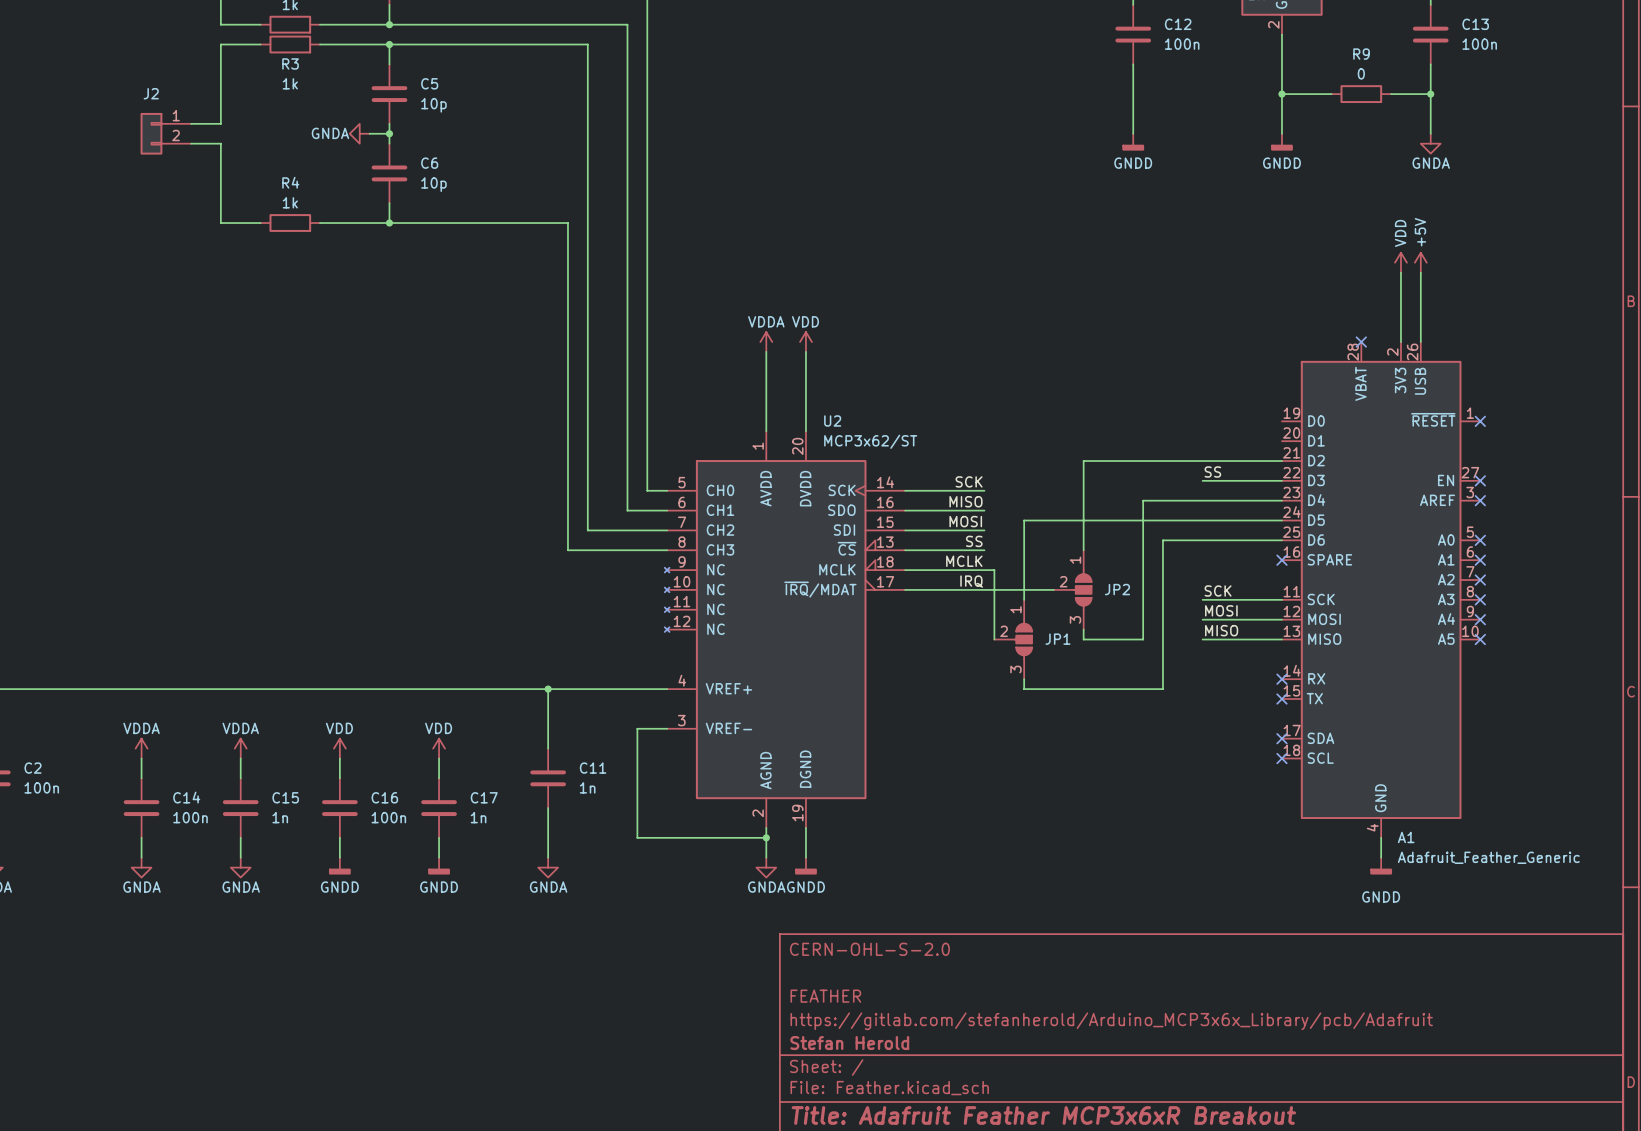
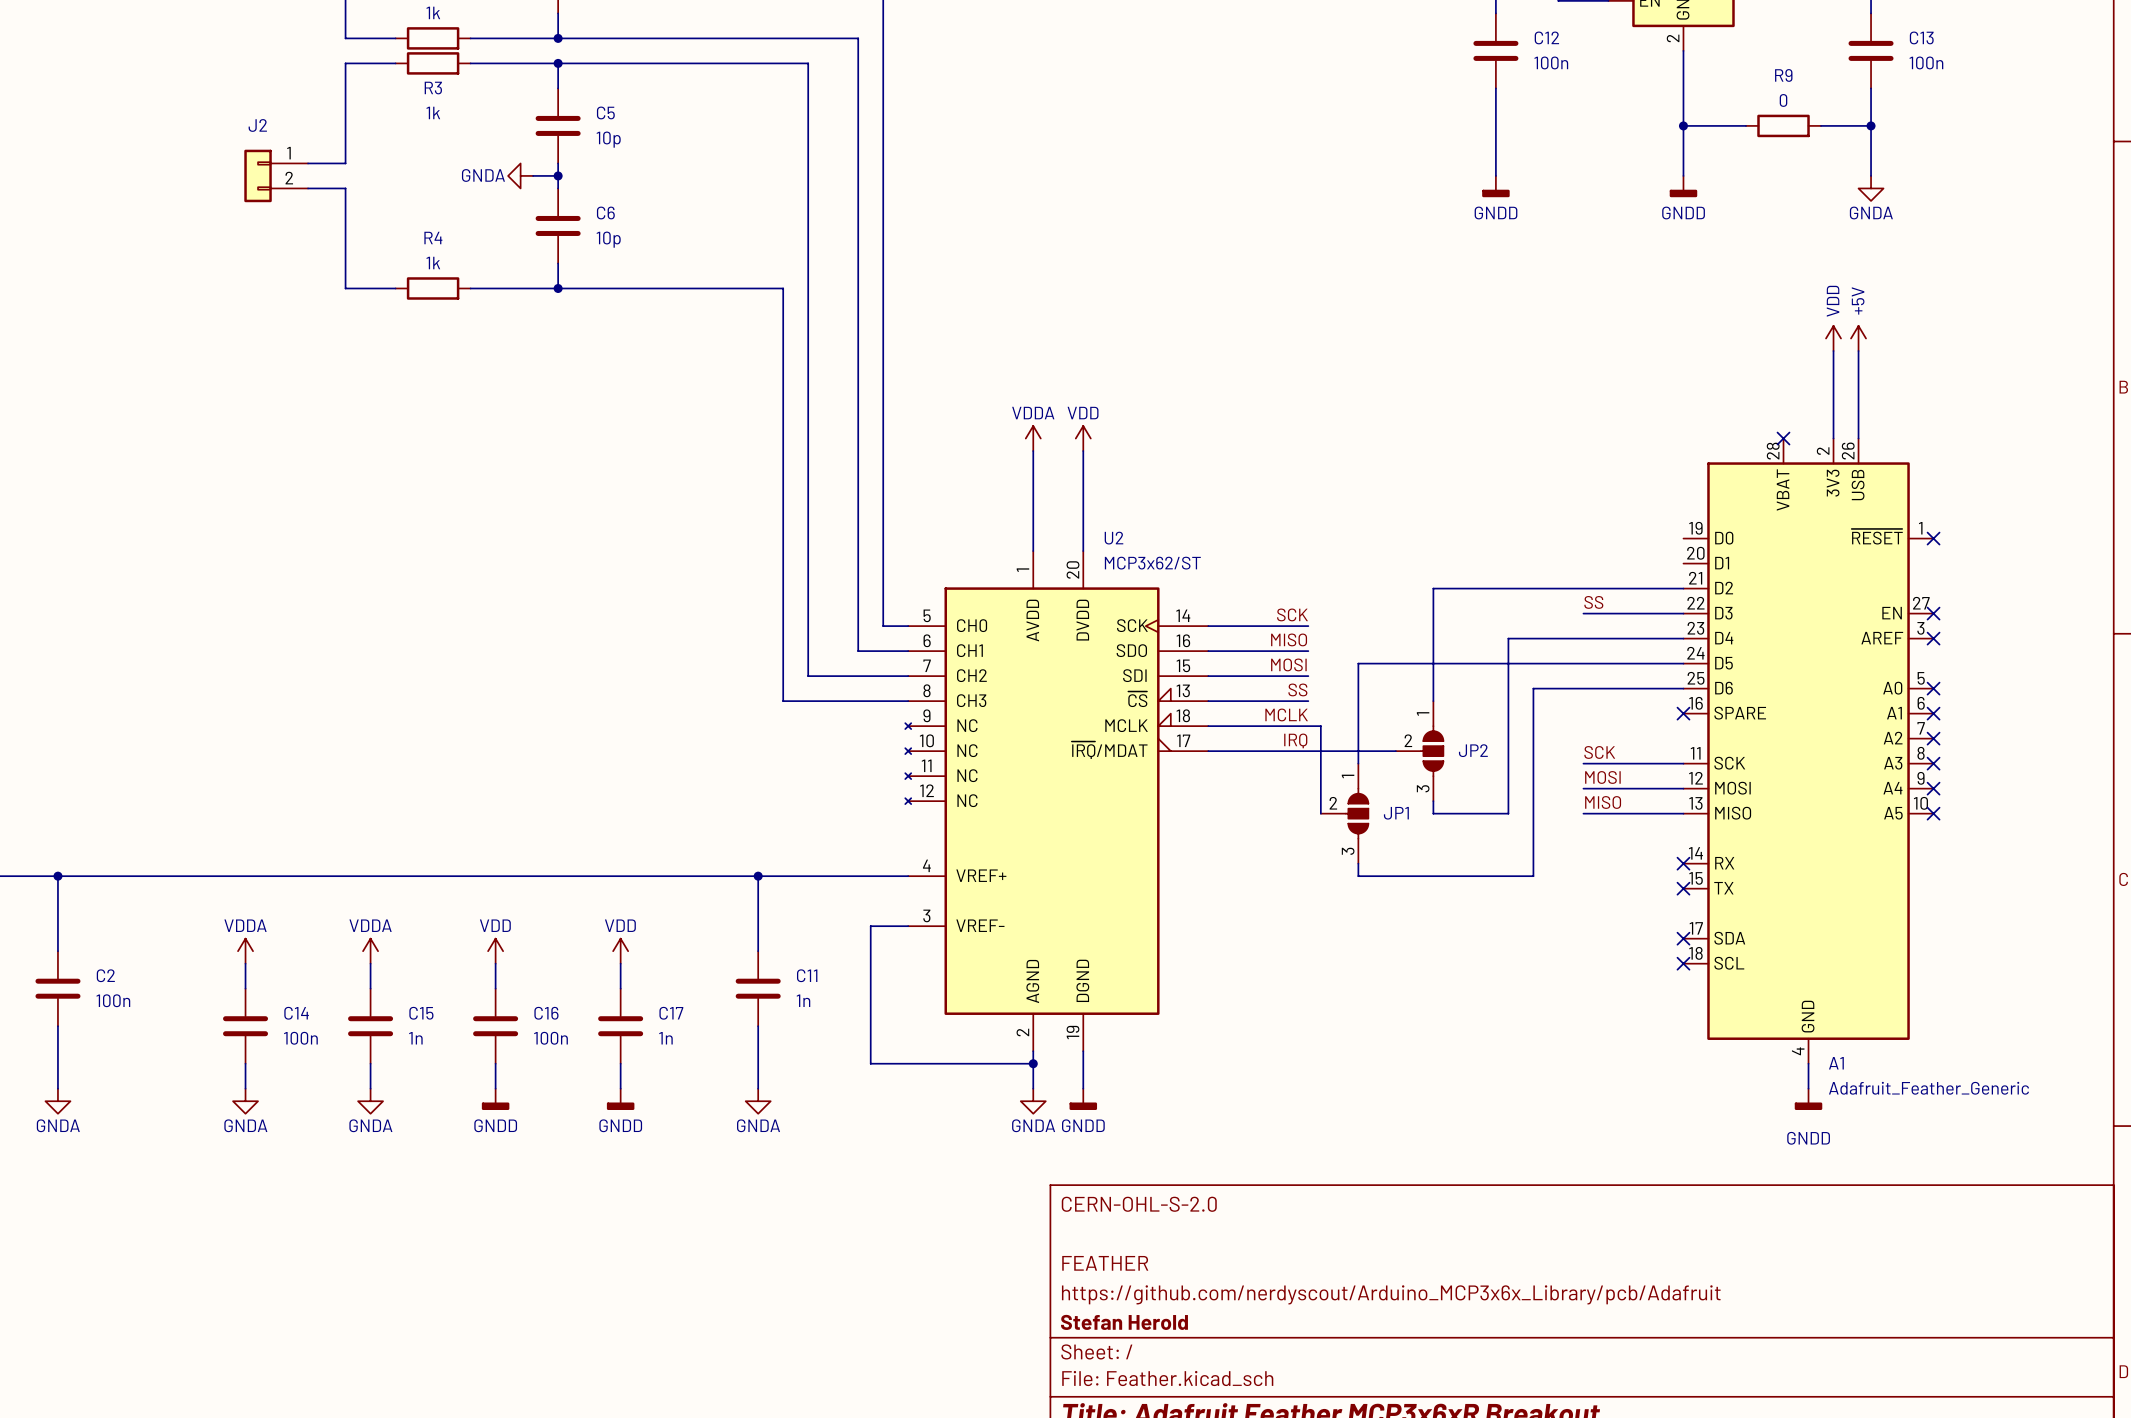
title block: https://gitlab.com/stefanherold/Arduino_MCP3x6x_Library/pcb/Adafruit (1111, 1021) -> https://github.com/nerdyscout/Arduino_MCP3x6x_Library/pcb/Adafruit (1391, 1294)

